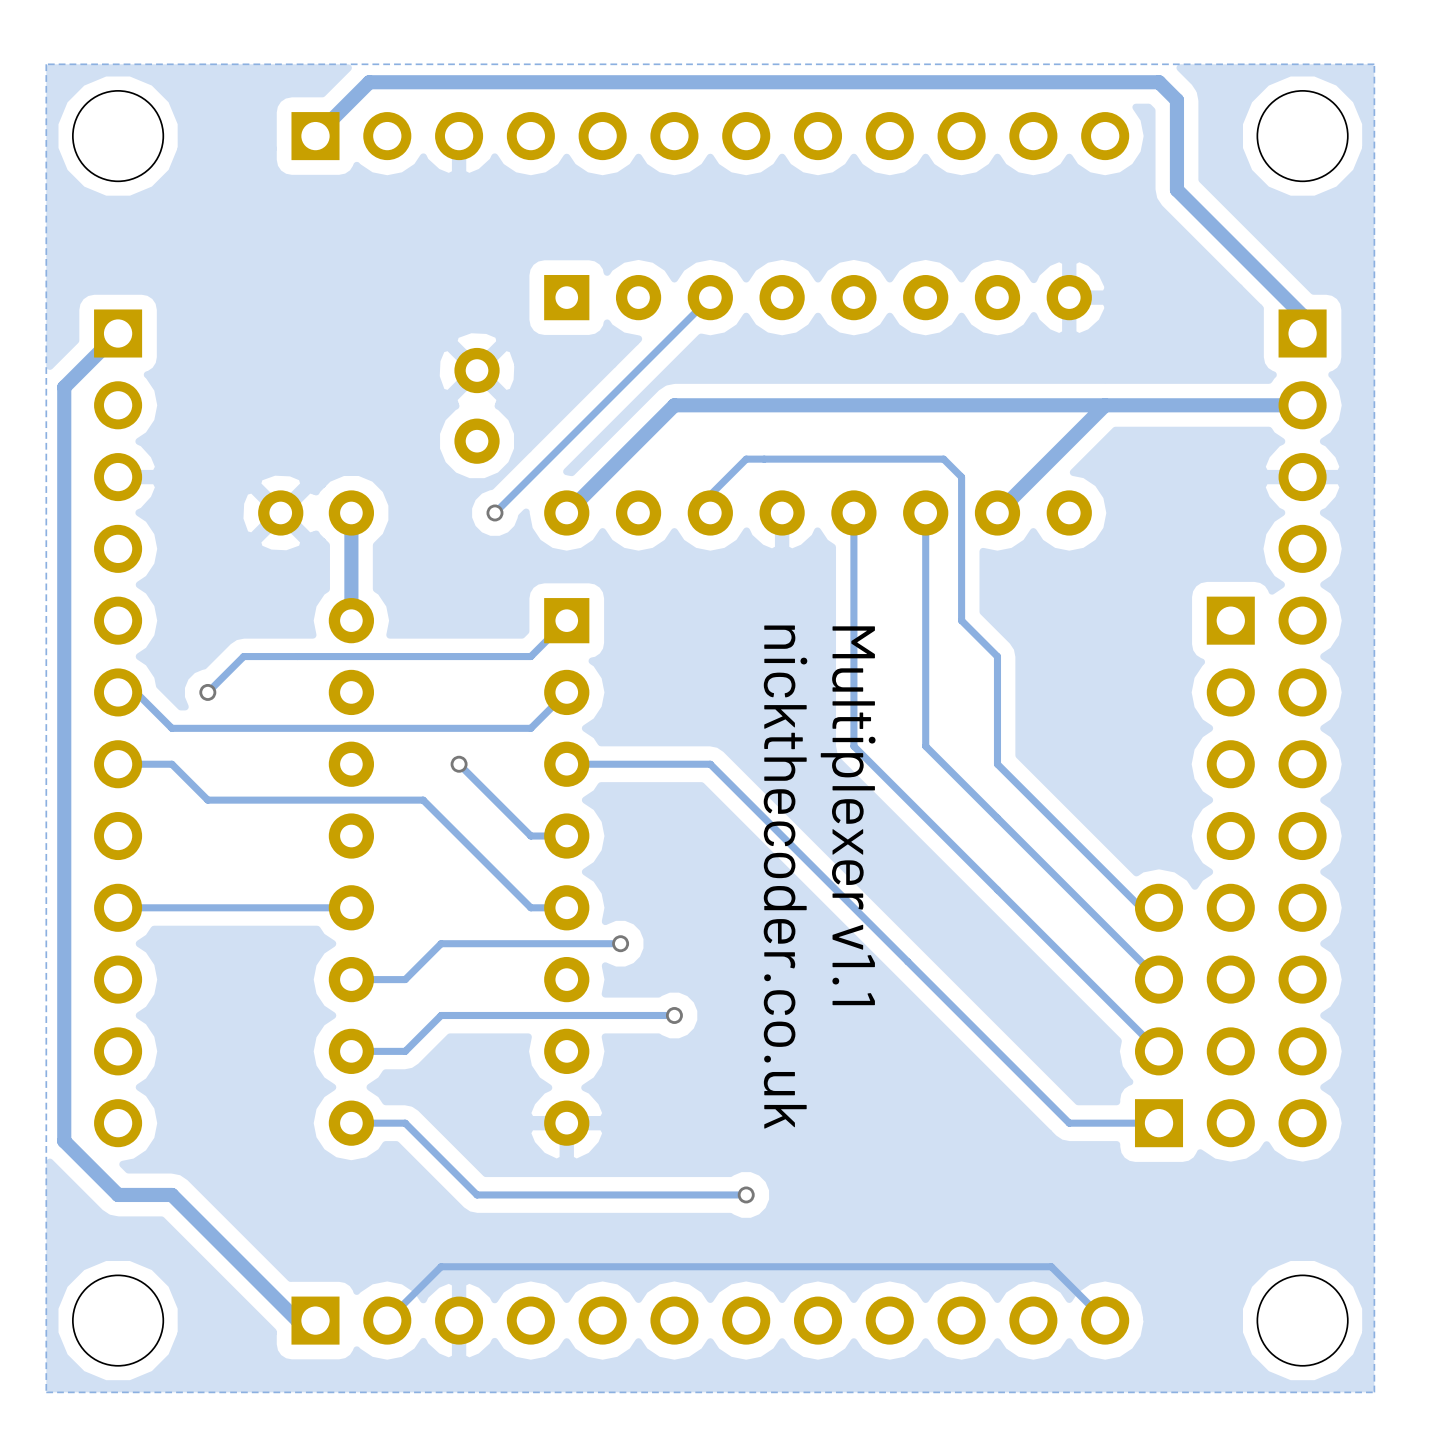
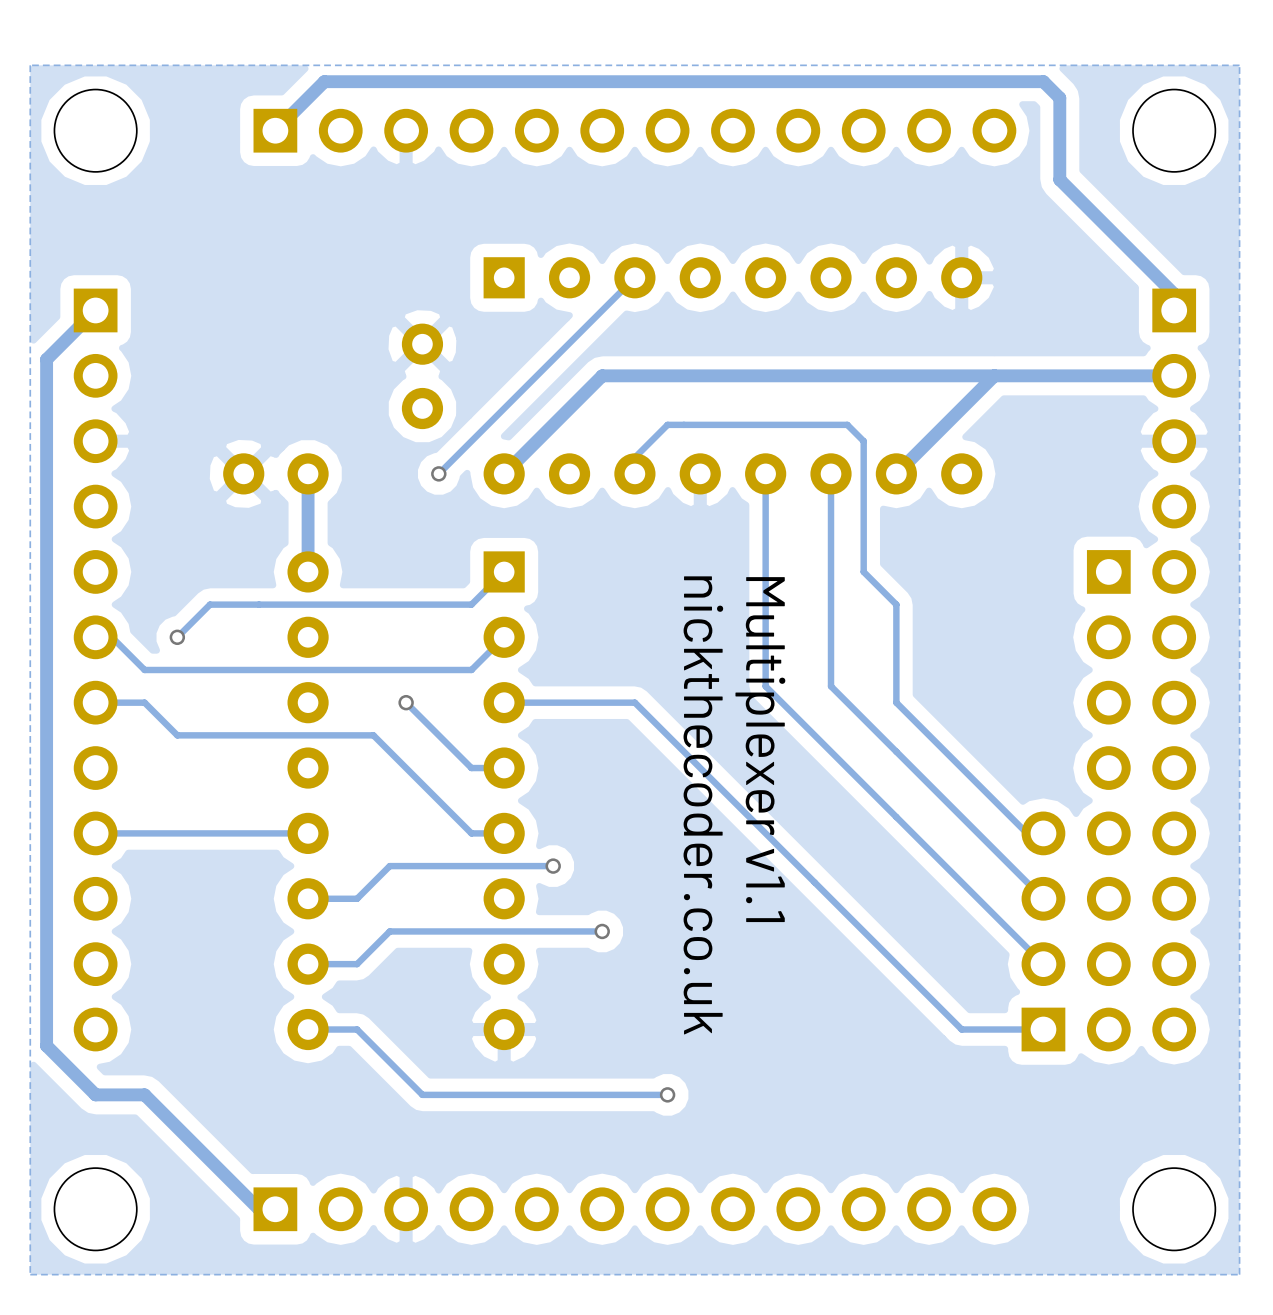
track: (1105, 1320) (1051, 1266) (441, 1266) (387, 1320) -> none

